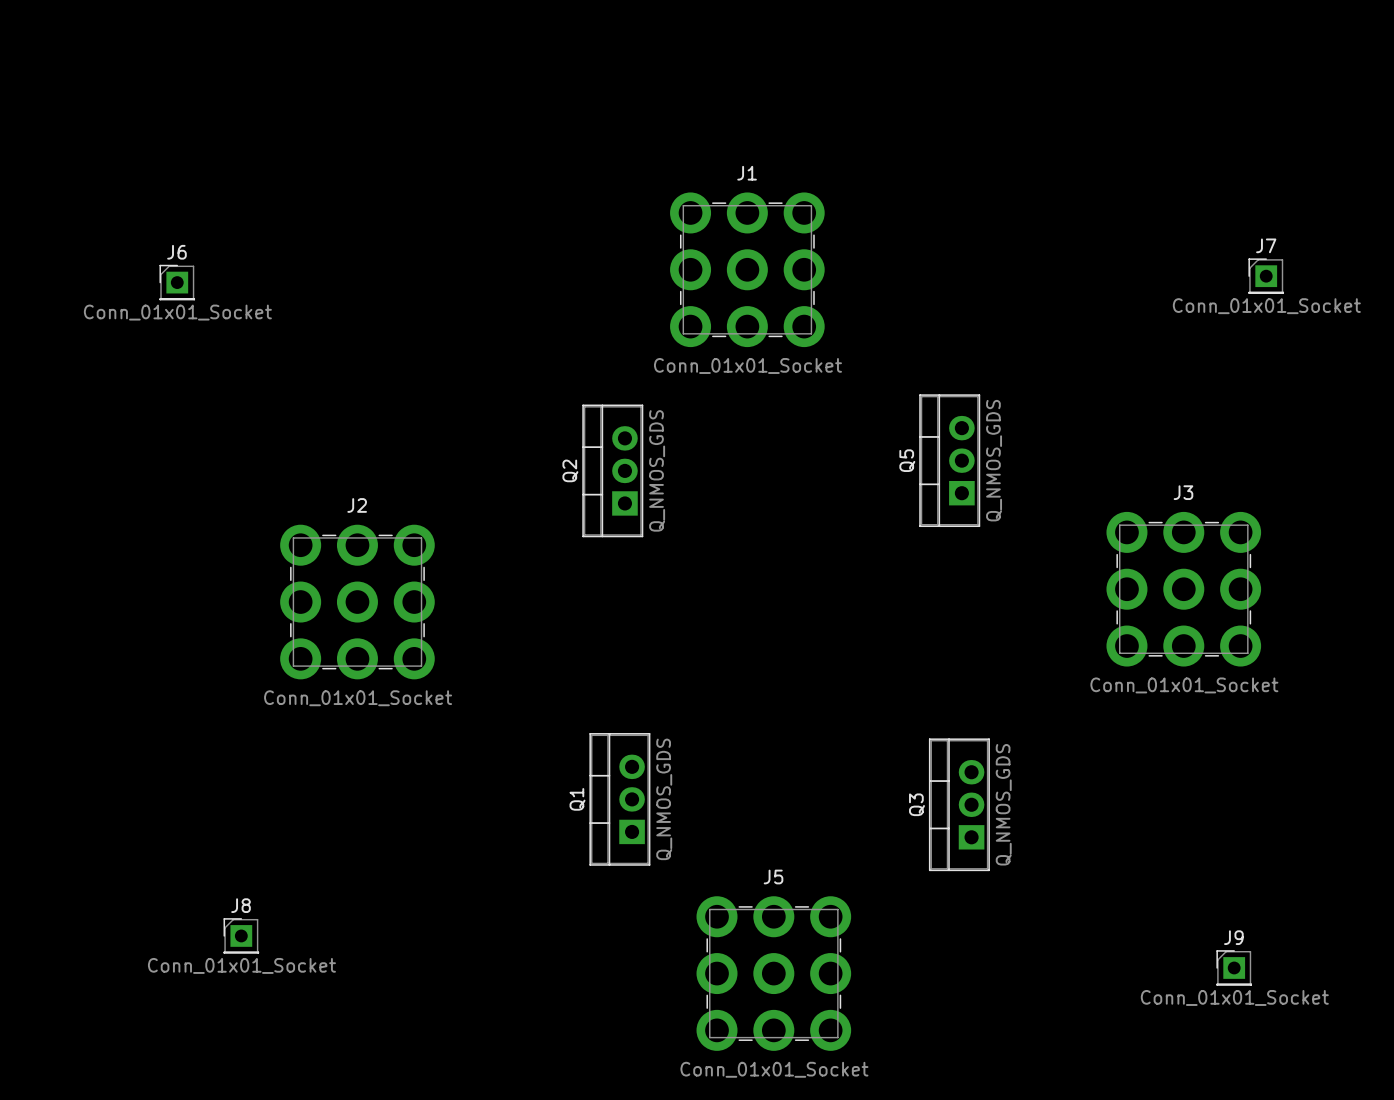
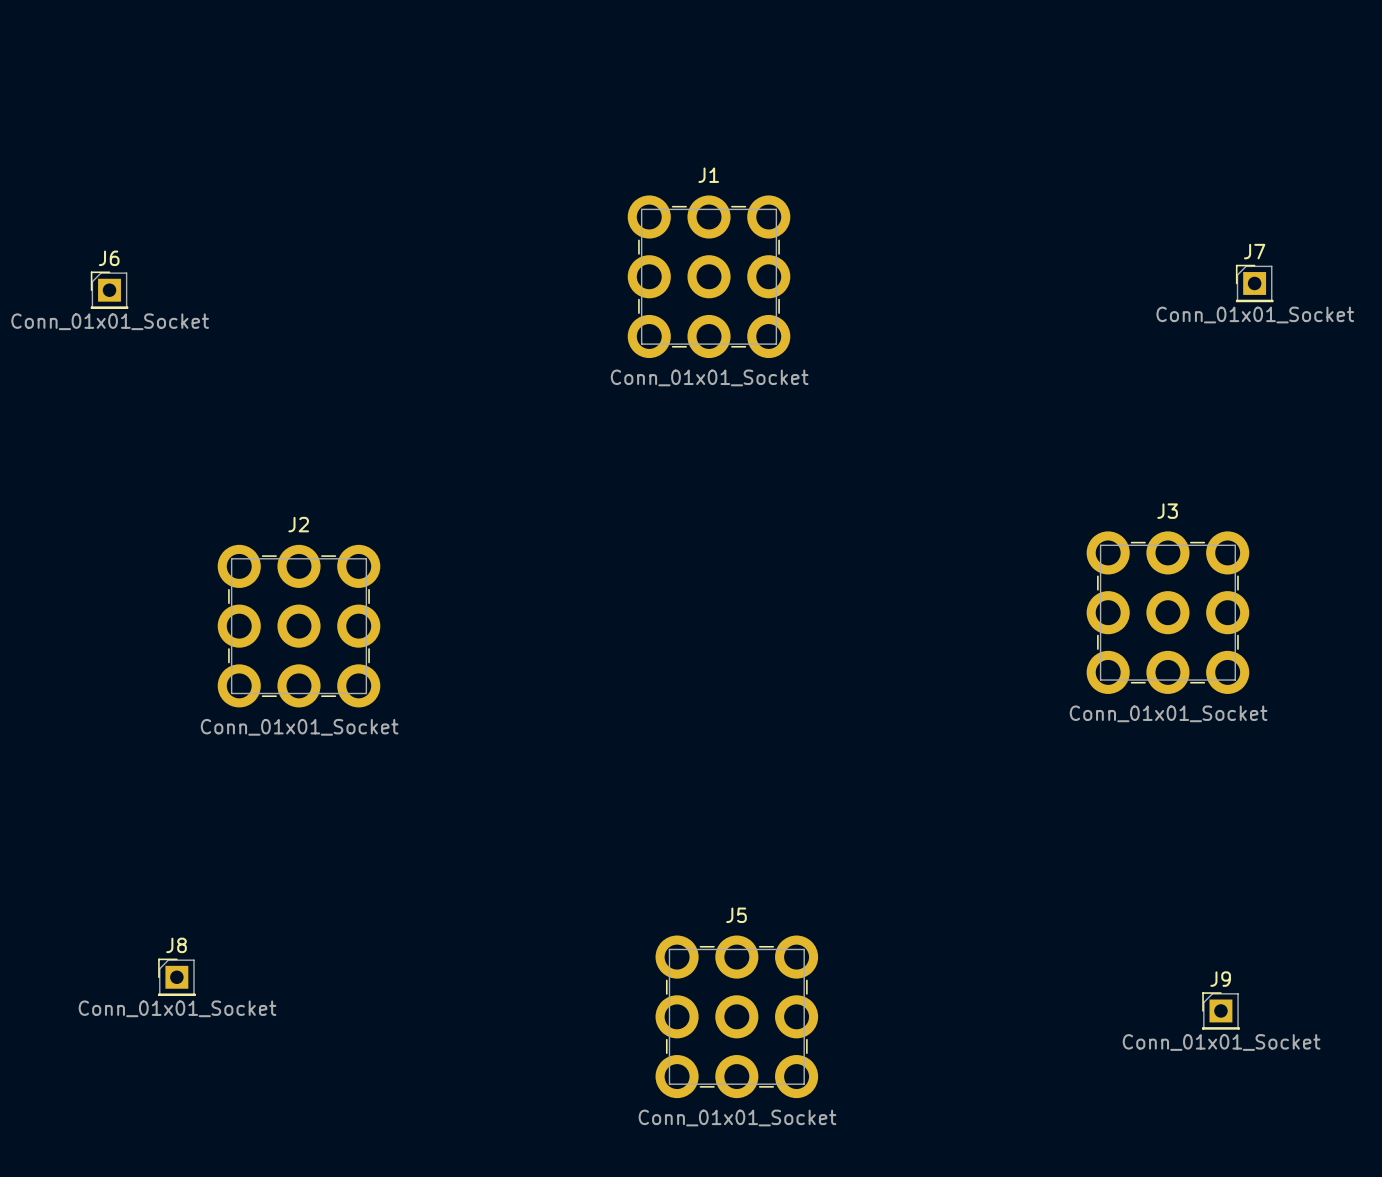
Q5: Q_NMOS_GDS (949, 460) -> none
Q2: Q_NMOS_GDS (612, 470) -> none
Q1: Q_NMOS_GDS (619, 799) -> none
Q3: Q_NMOS_GDS (959, 804) -> none

